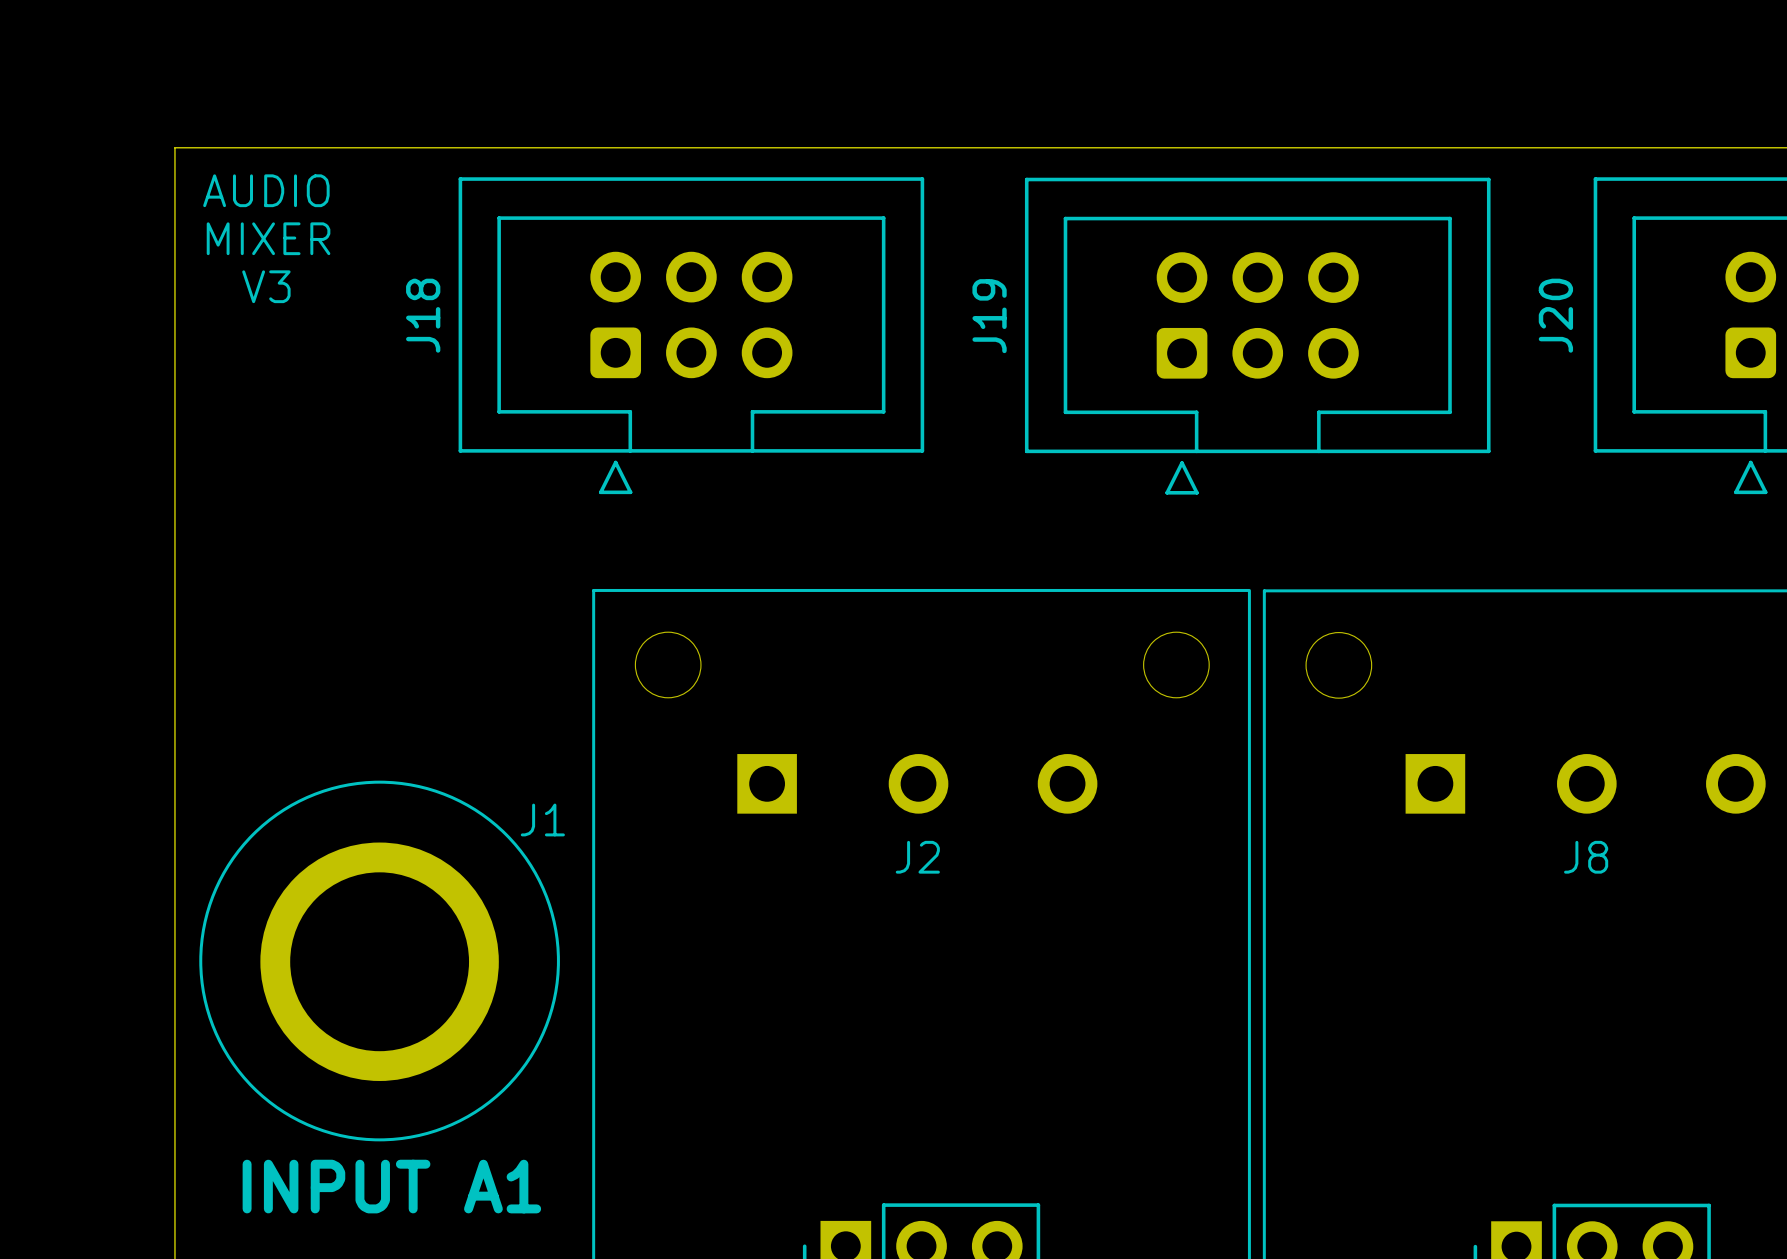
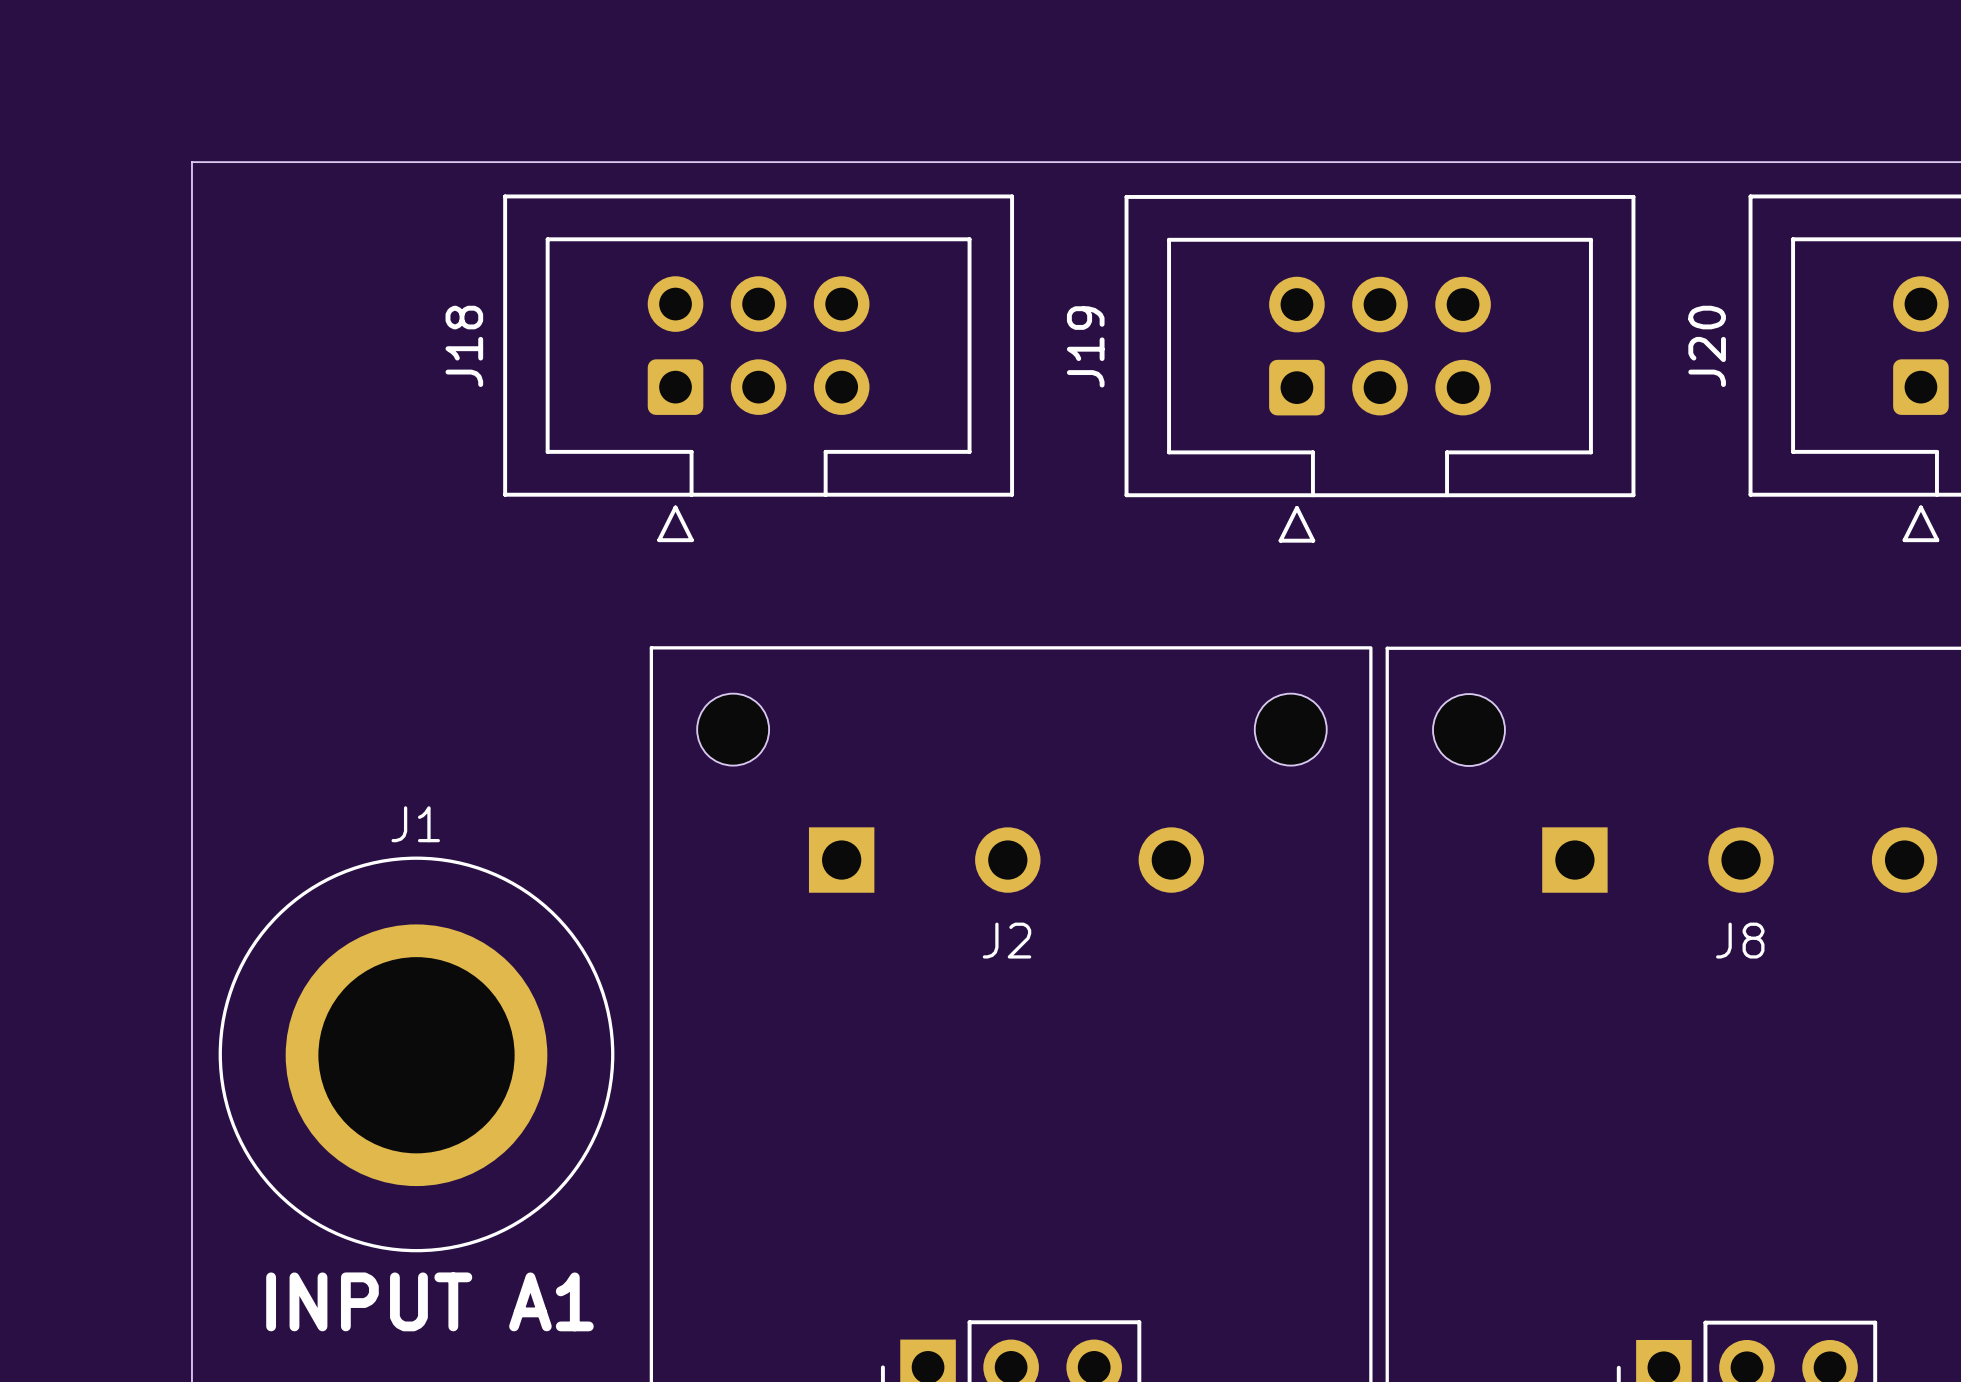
text: AUDIO (266, 190) -> none
text: MIXER (268, 238) -> none
text: V3 (266, 286) -> none
J1 name position: J1 (542, 819) -> J1 (415, 824)

